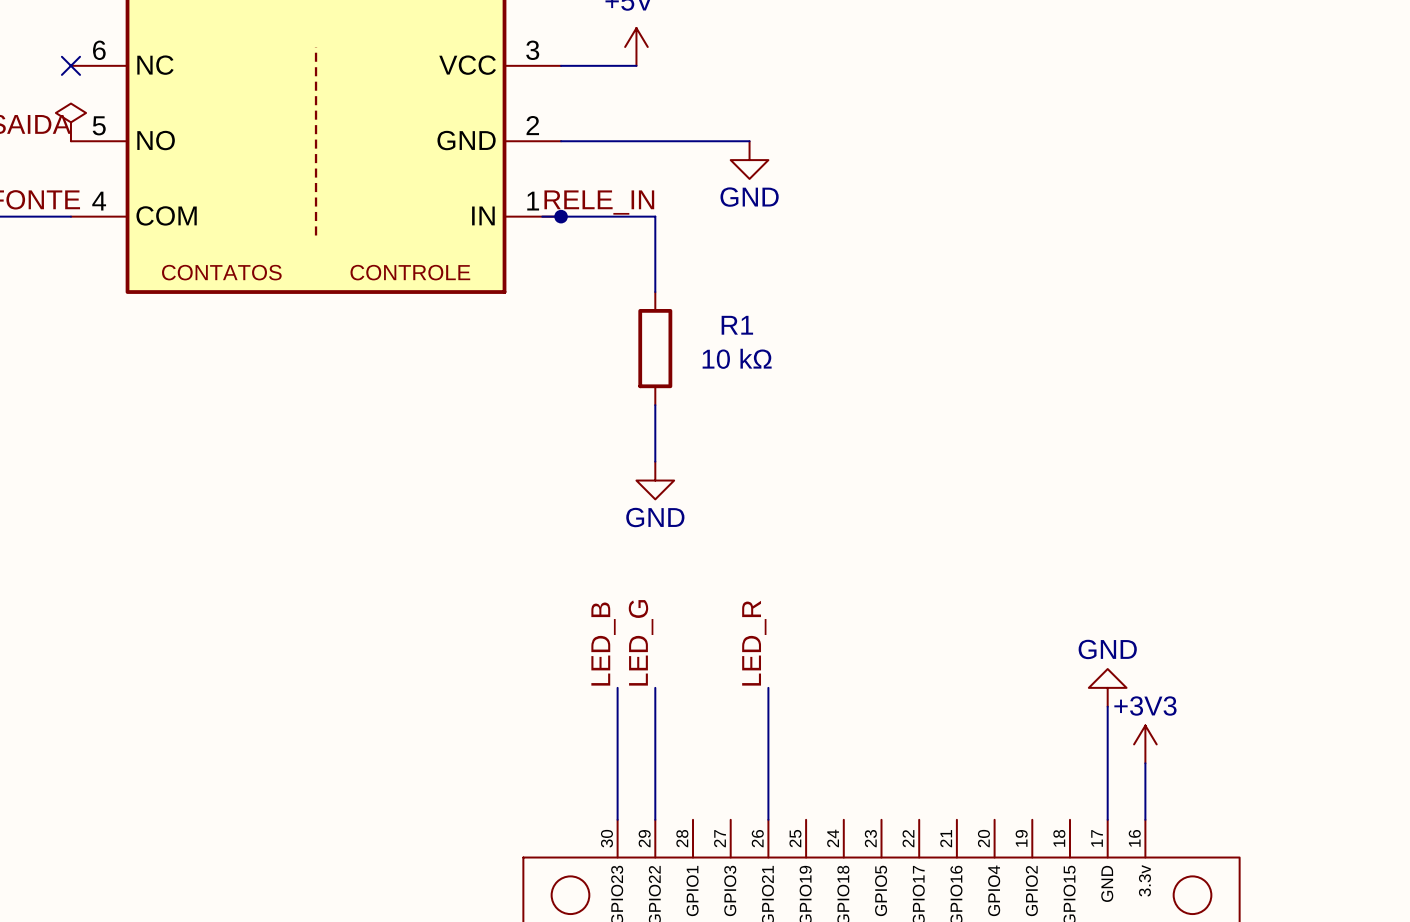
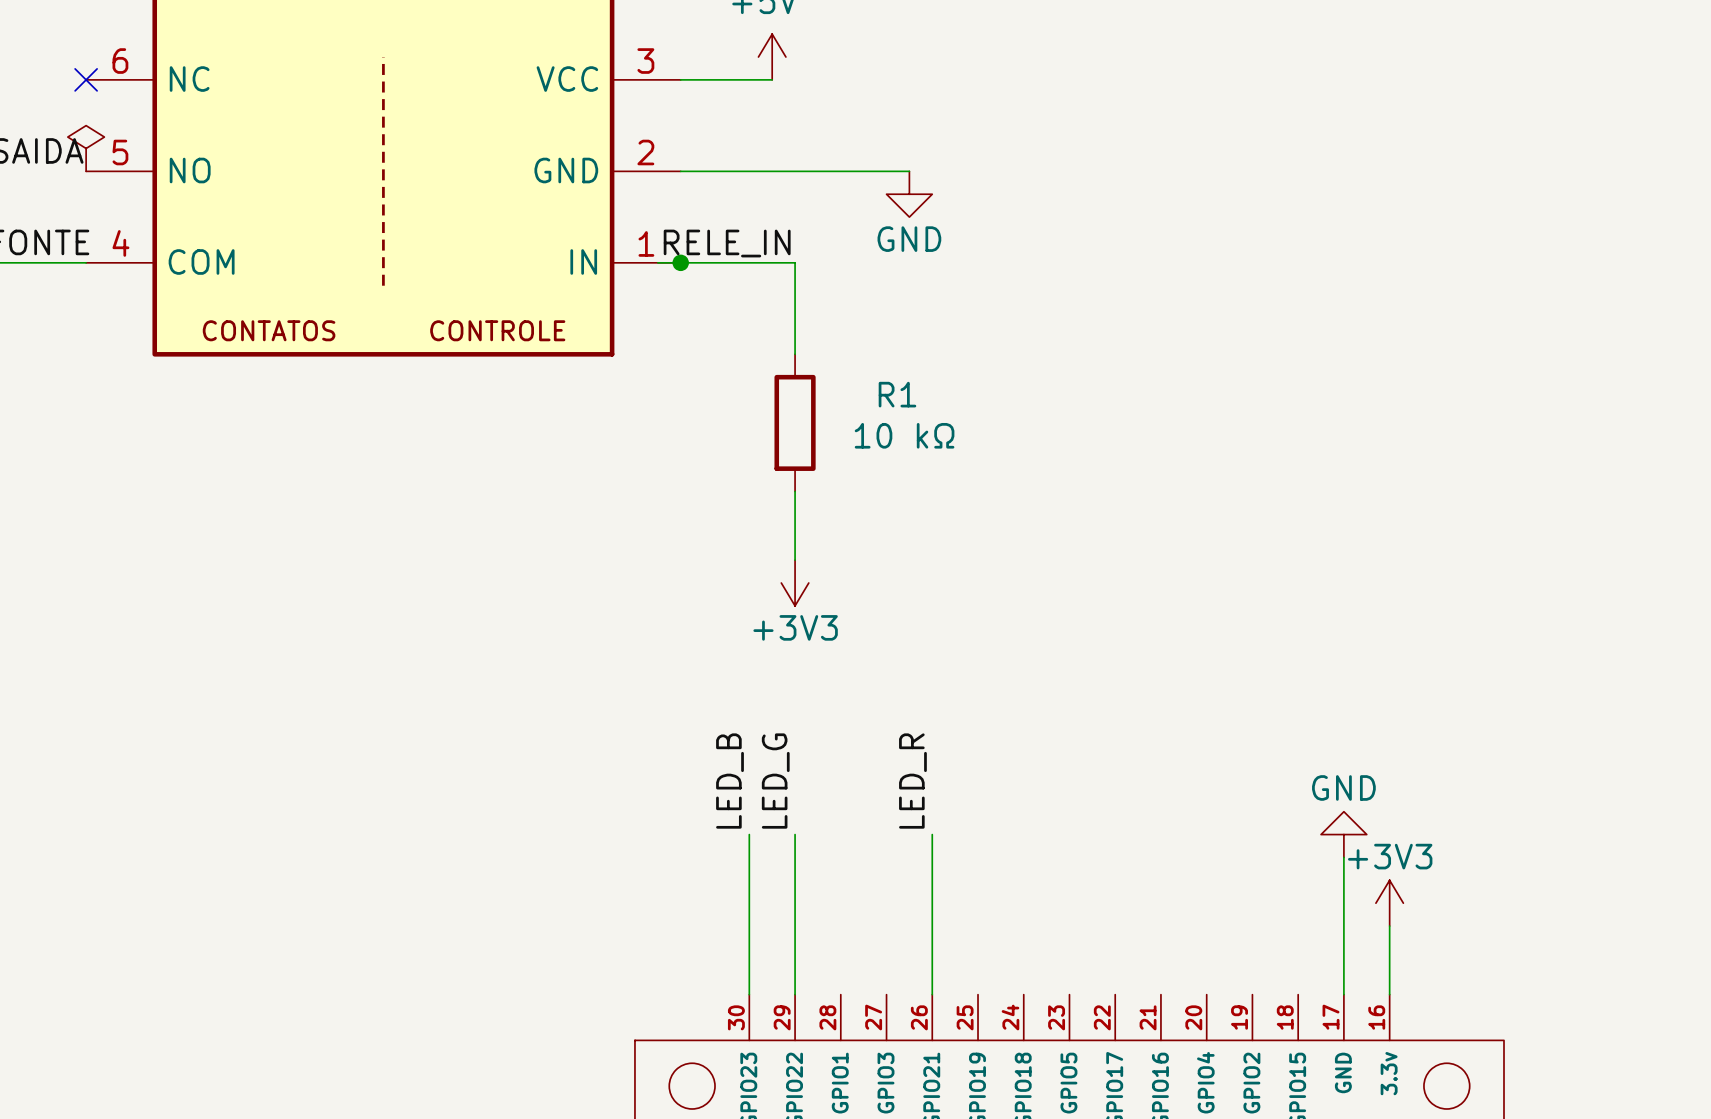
power symbol: GND (655, 480) -> +3V3 (795, 583)

